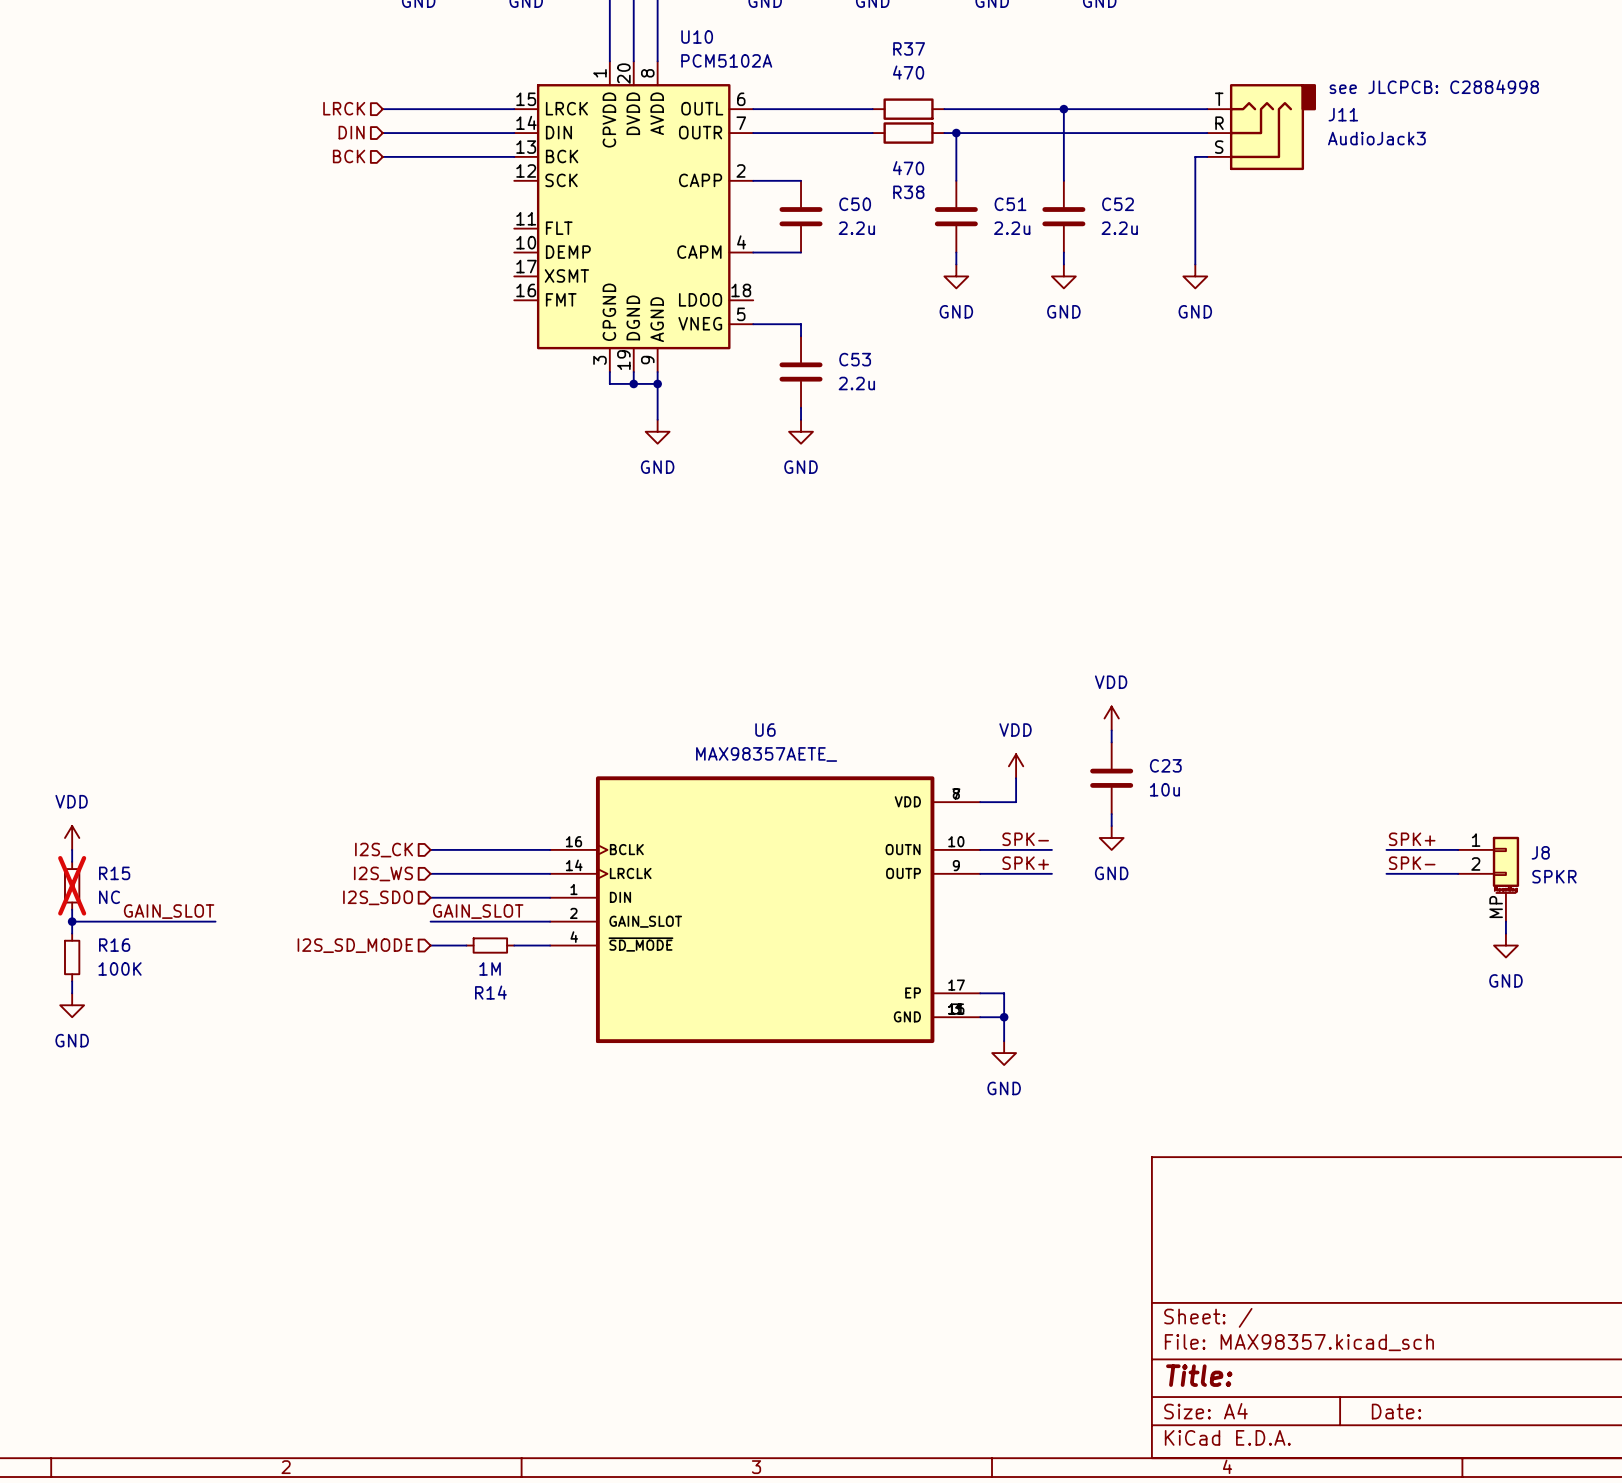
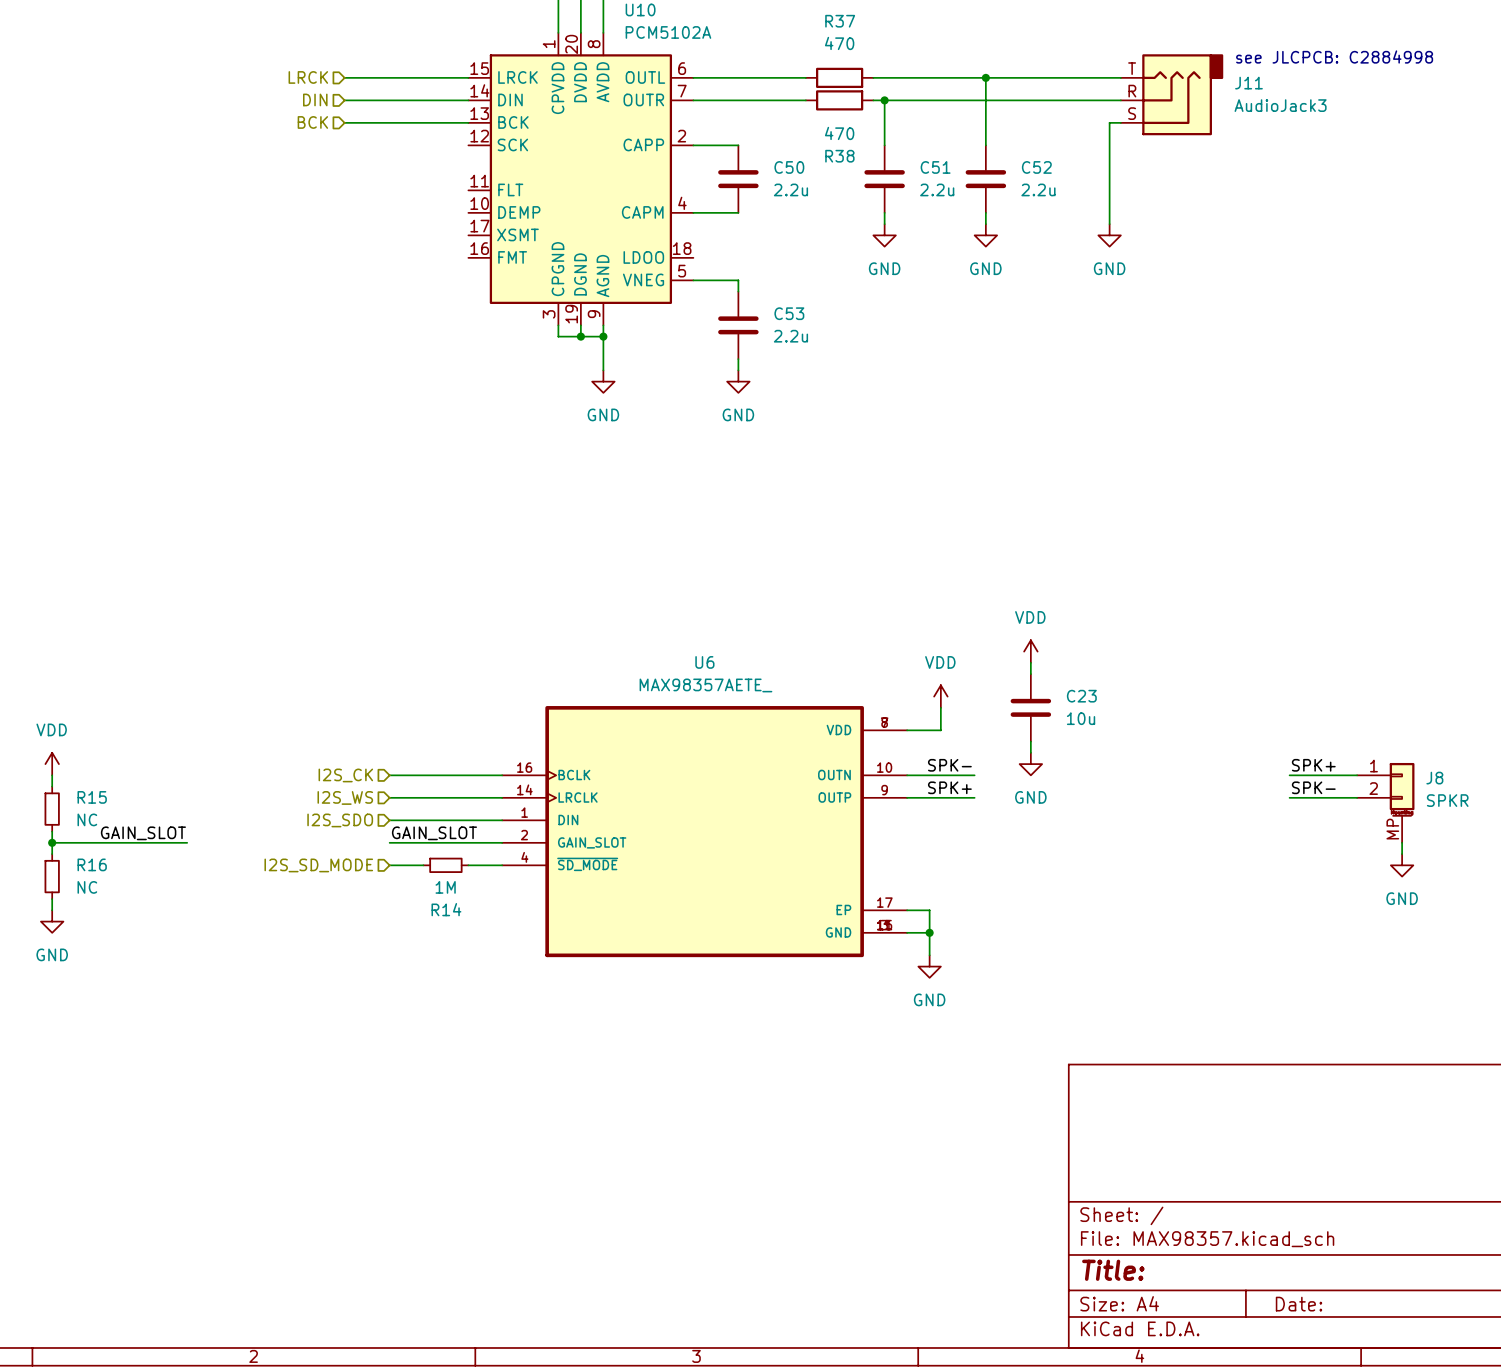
R15 do-not-place cross: (72, 885) -> none
R16 value: 100K (120, 968) -> NC (87, 887)

